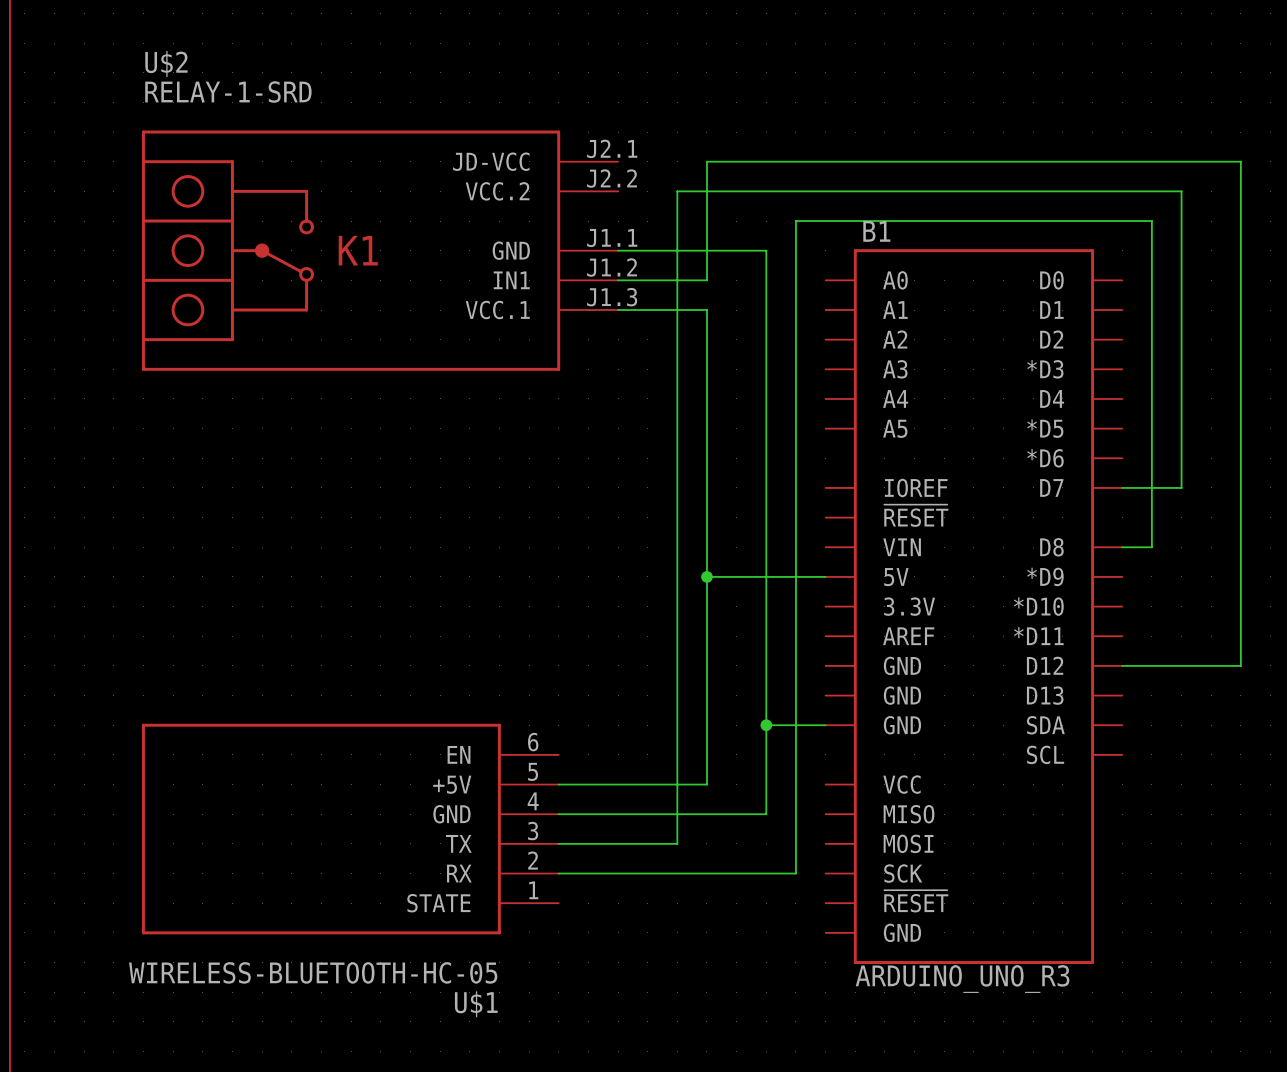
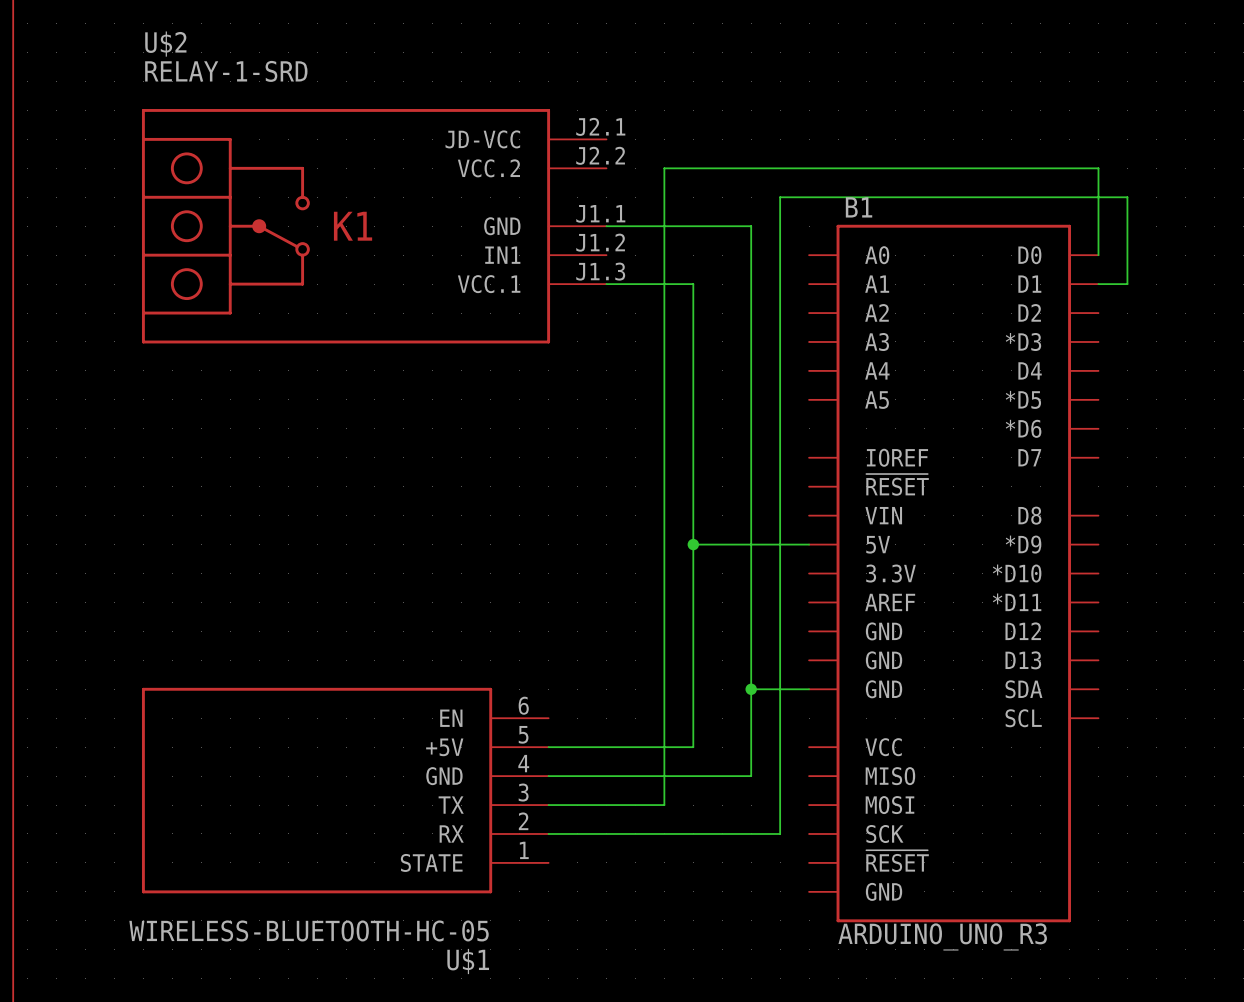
wire: (1122, 191) (1181, 191) (1181, 487) (1122, 487) -> (1098, 168) (1098, 255)
wire: (618, 280) (706, 280) (706, 161) (1240, 161) (1240, 665) (1122, 665) -> none
wire: (1151, 310) (1151, 547) (1122, 547) -> (1127, 284) (1098, 284)

